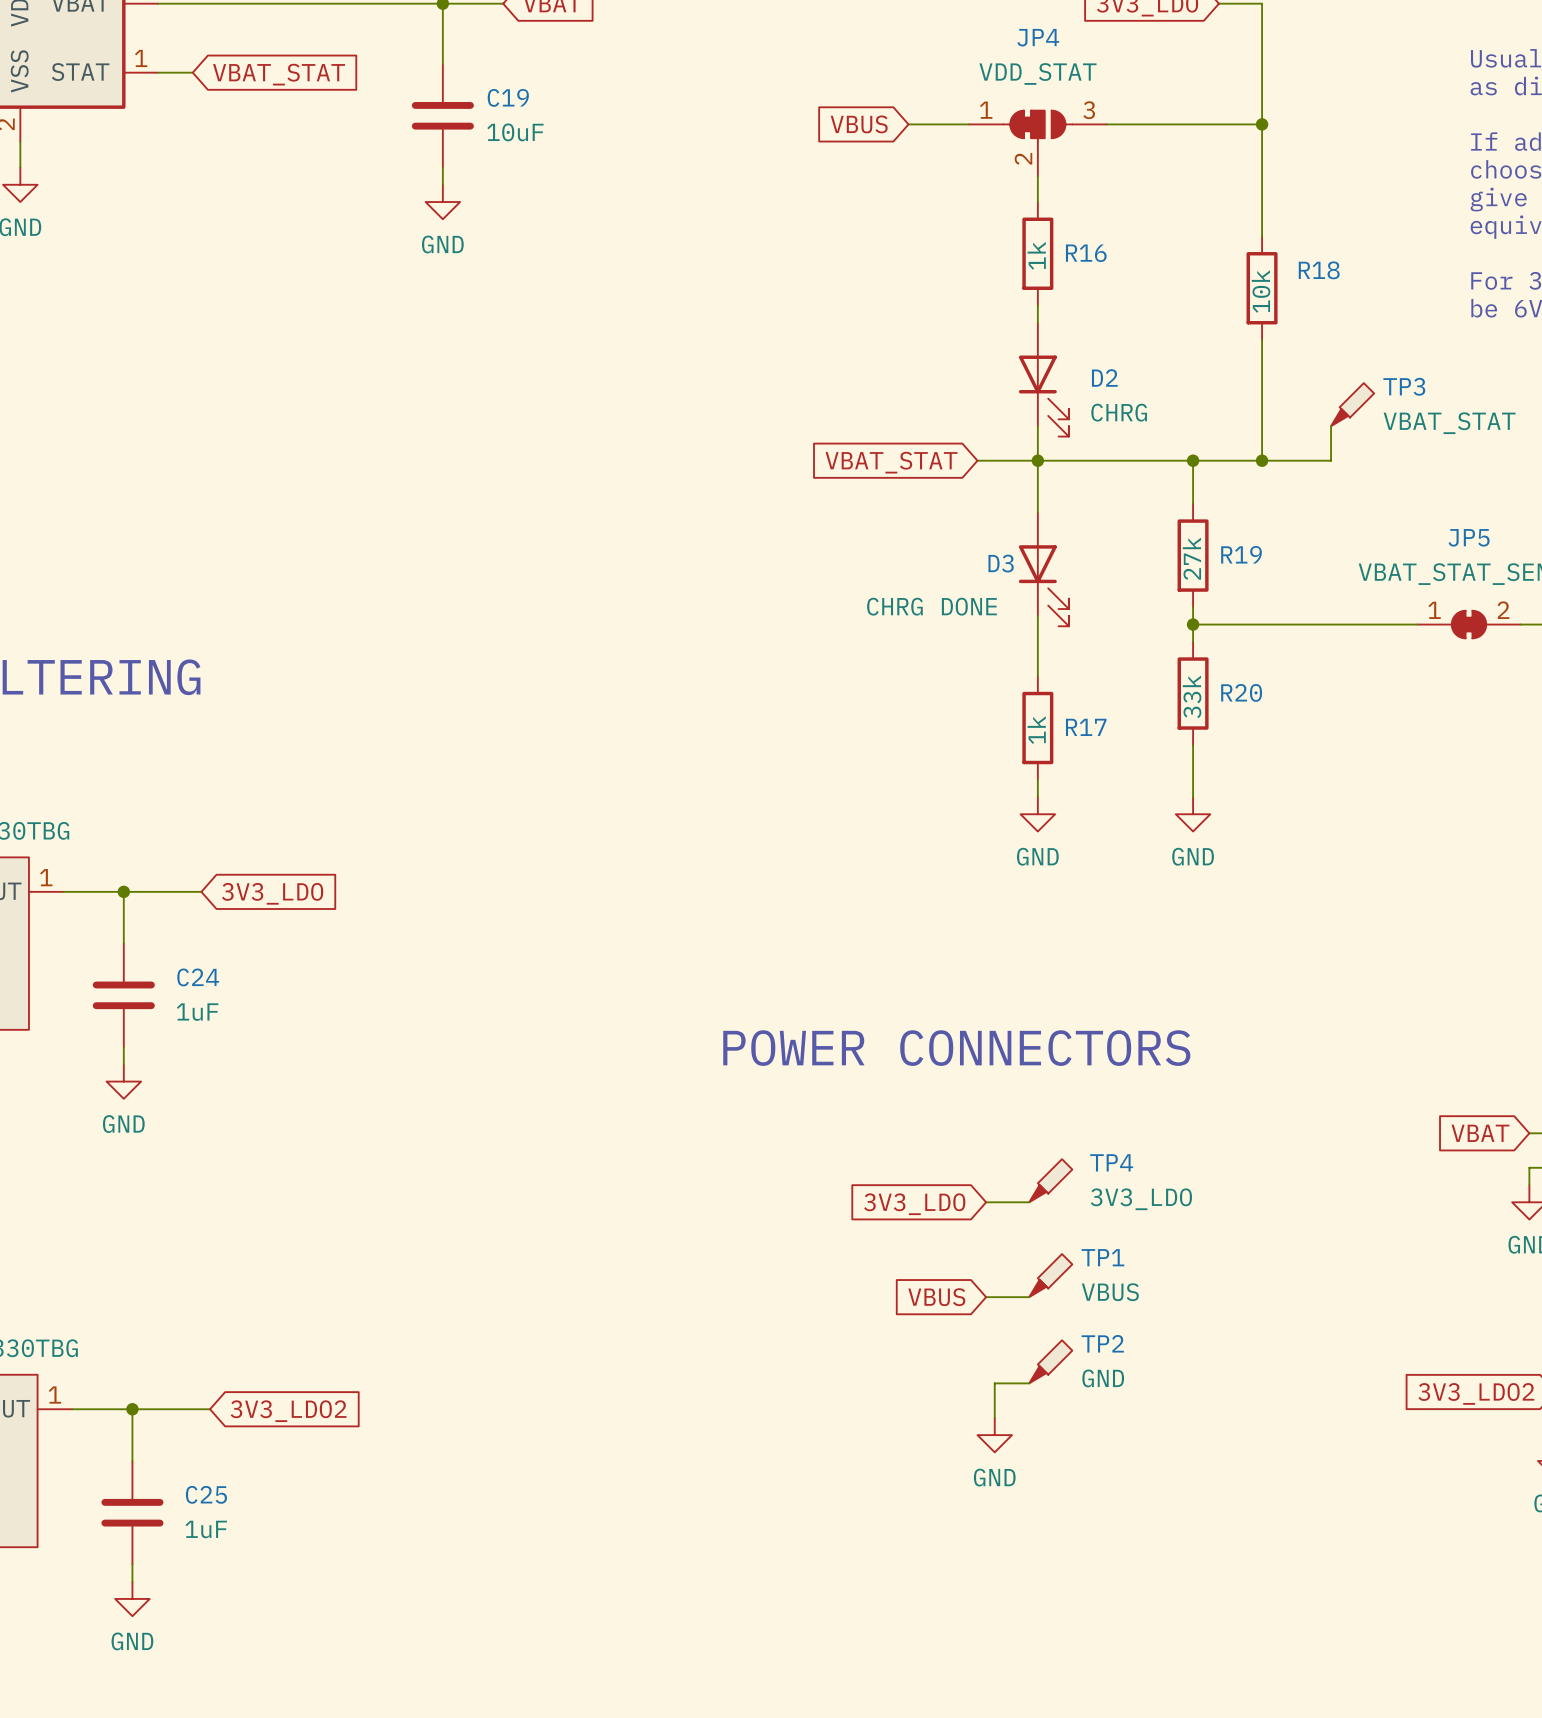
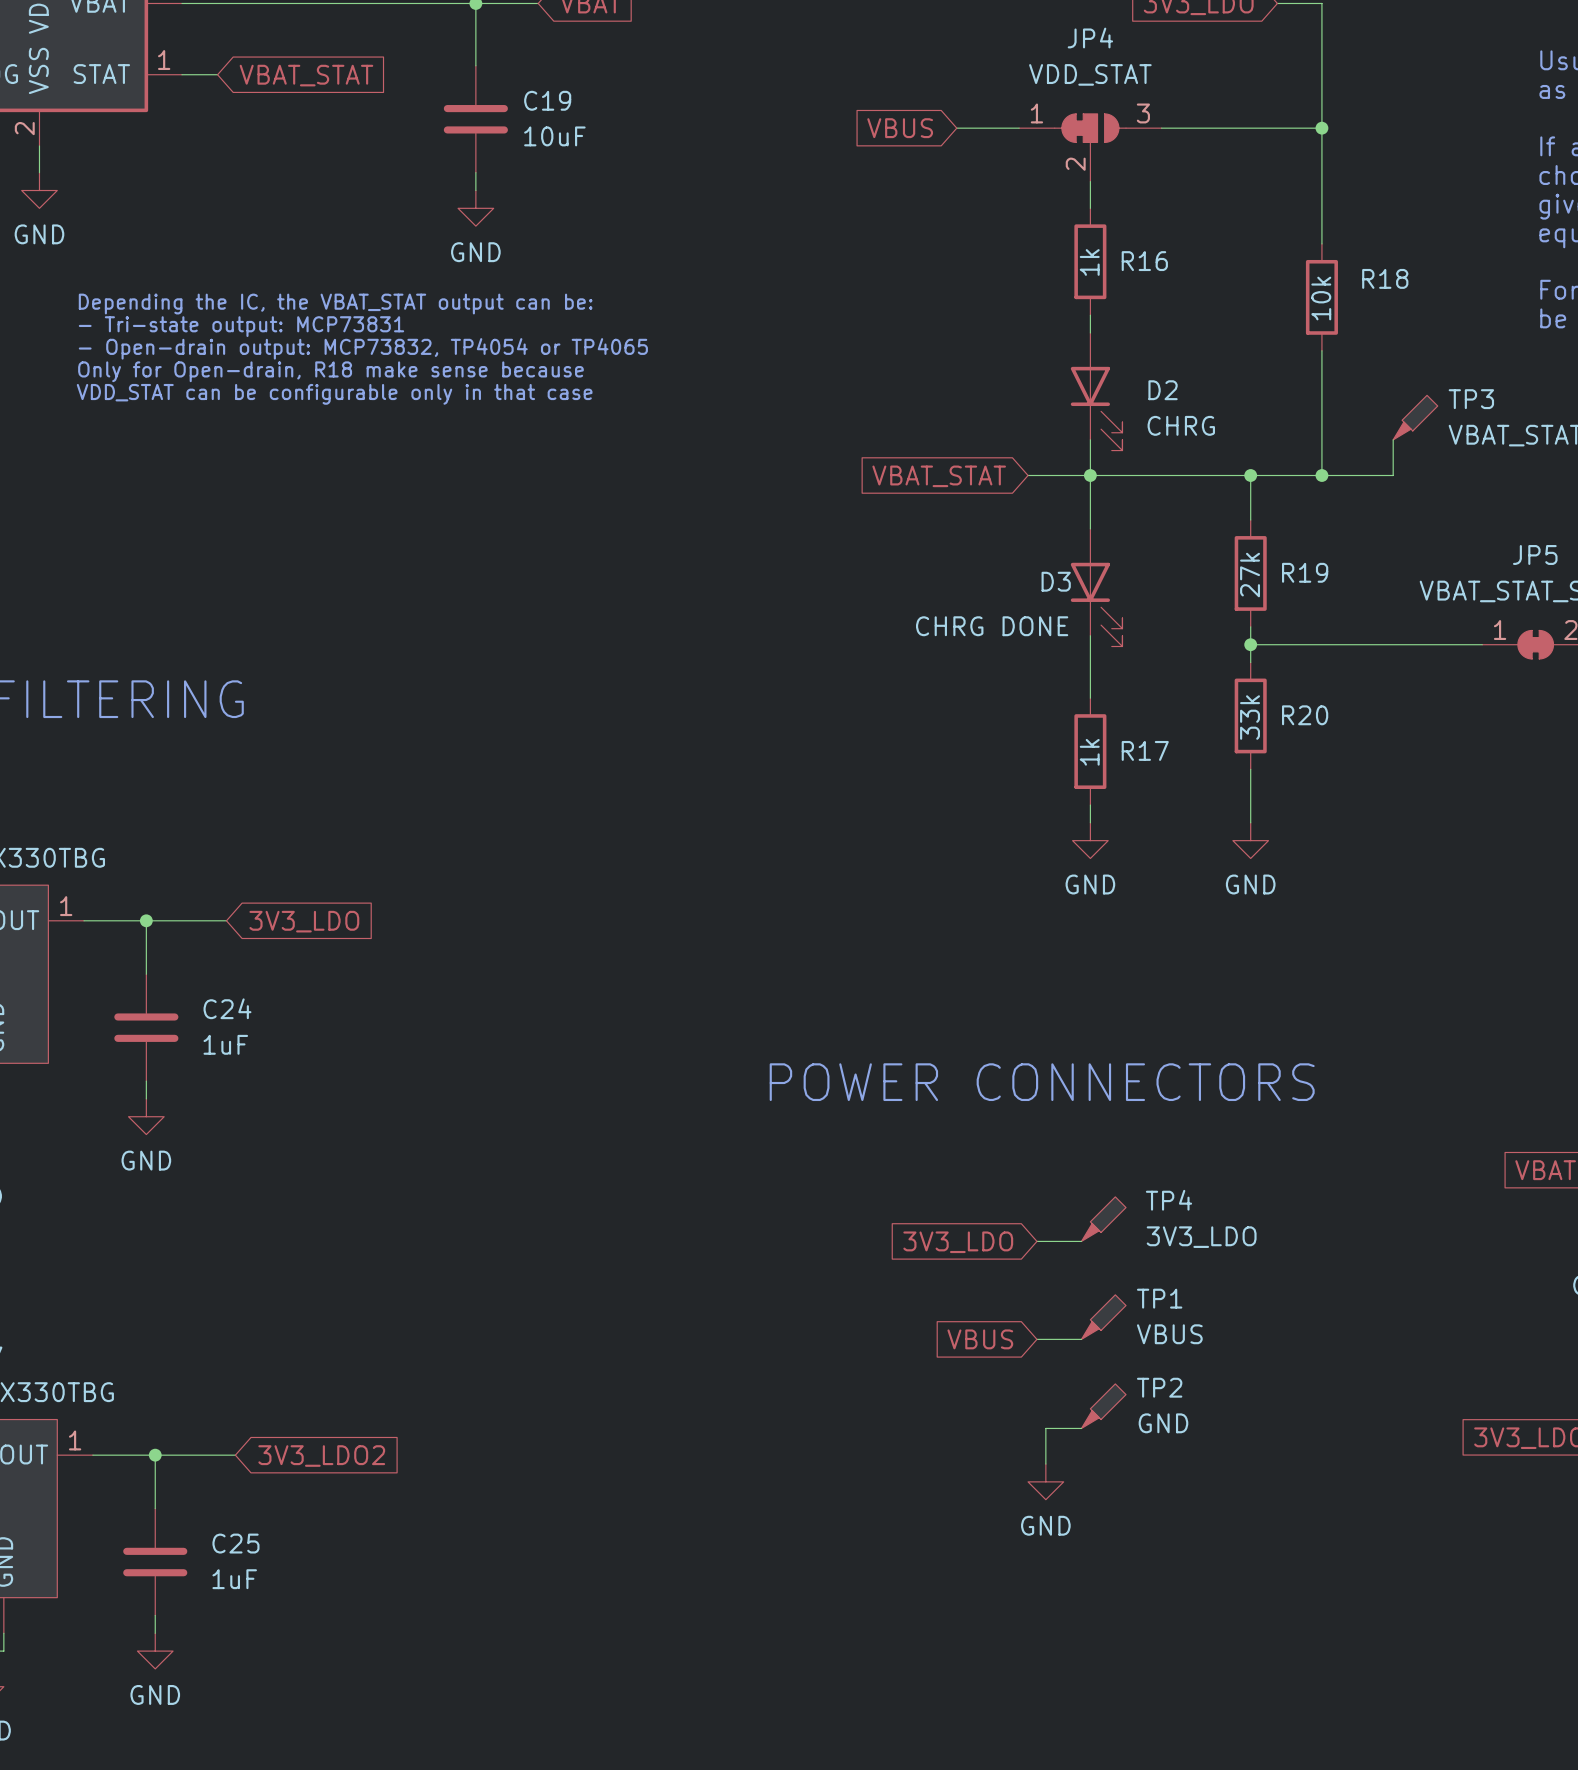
text: none -> Depending the IC, the VBAT_STAT output can be: (335, 304)
text: none -> - Tri-state output: MCP73831 (241, 326)
text: none -> - Open-drain output: MCP73832, TP4054 or TP4065 (363, 348)
text: none -> Only for Open-drain, R18 make sense because (330, 371)
text: none -> VDD_STAT can be configurable only in that case (334, 394)

